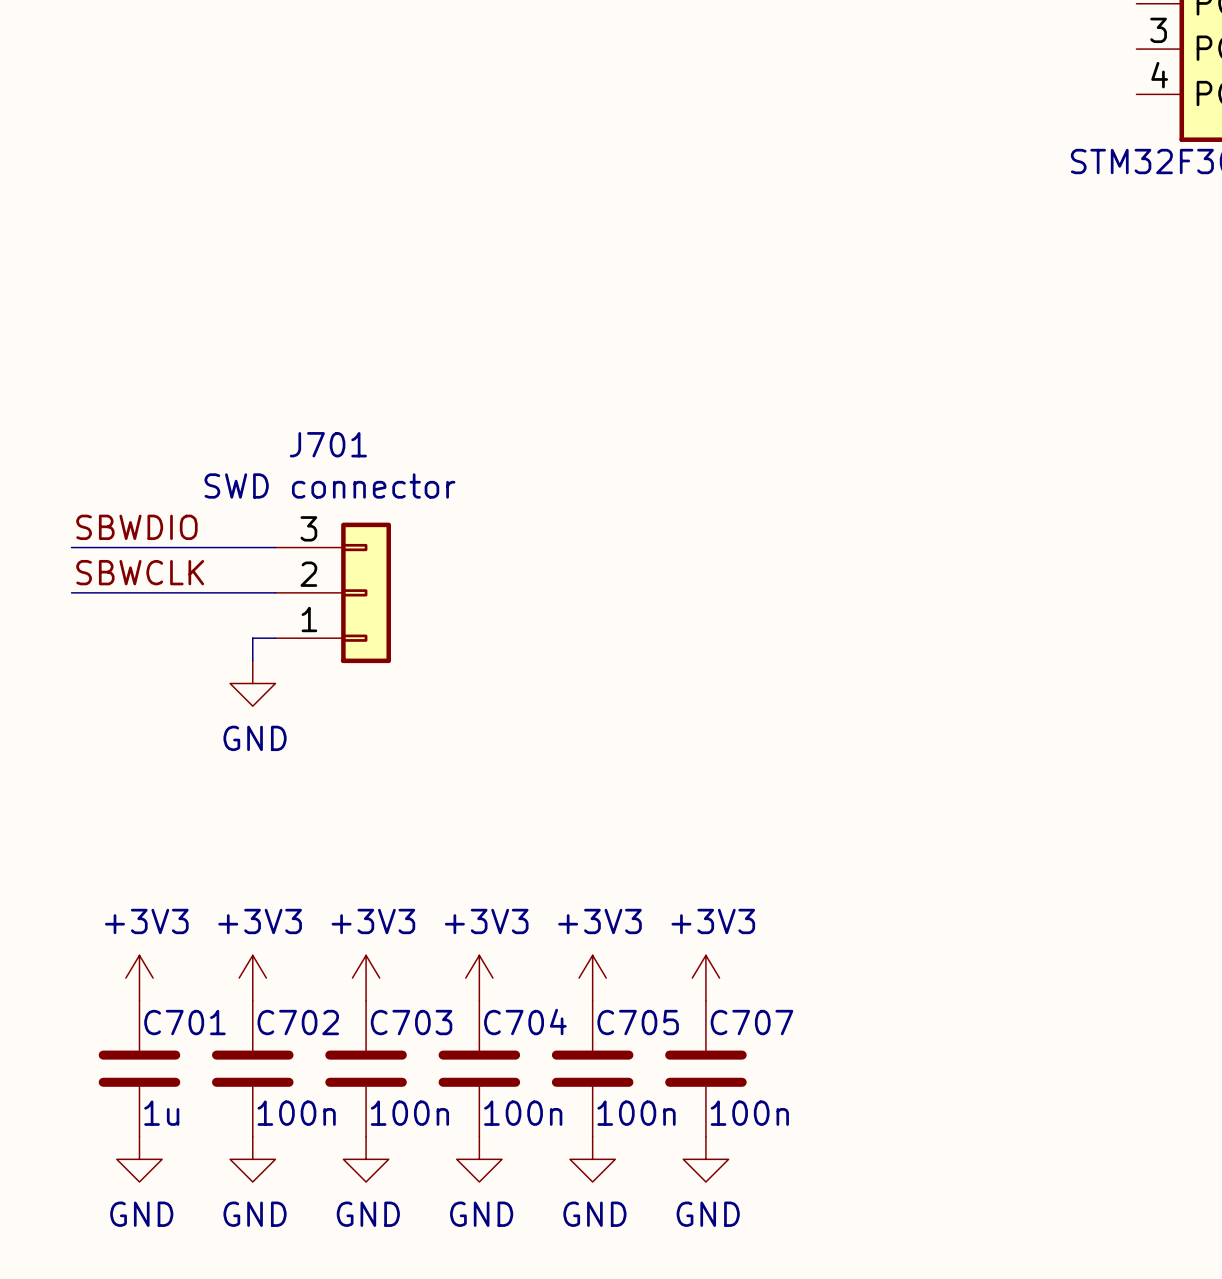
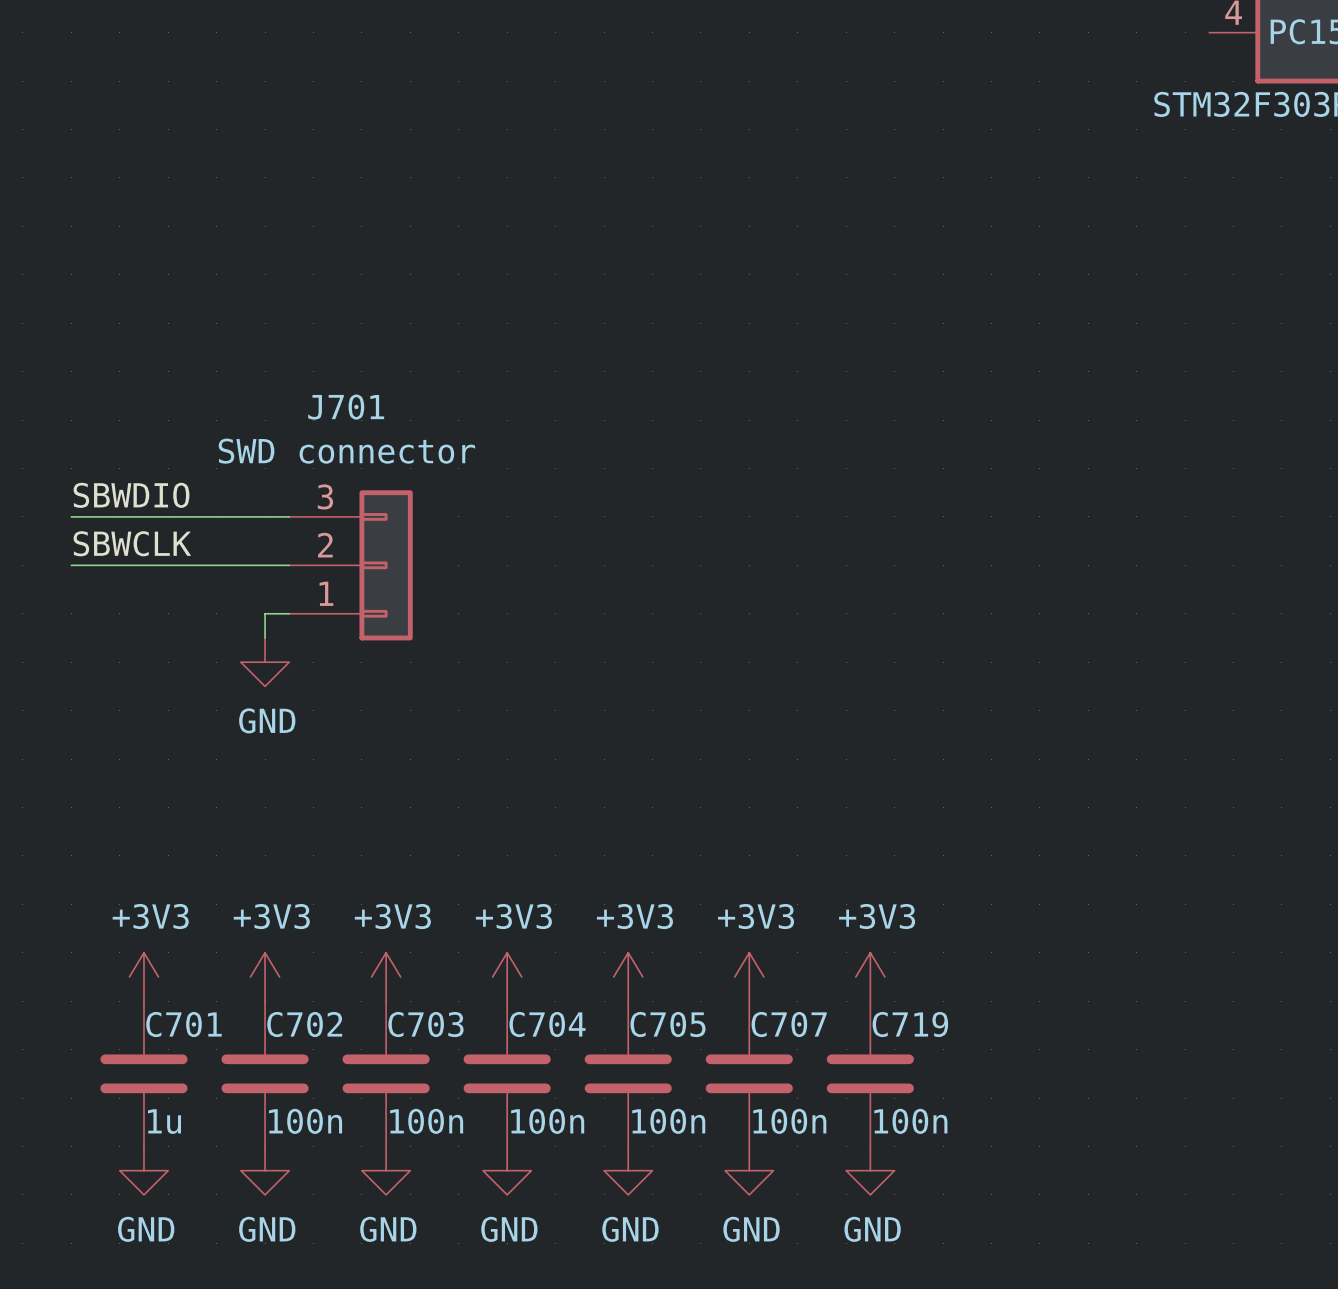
power symbol: none -> +3V3 (870, 976)
C719: none -> 100n (870, 1073)
power symbol: none -> GND (870, 1170)

